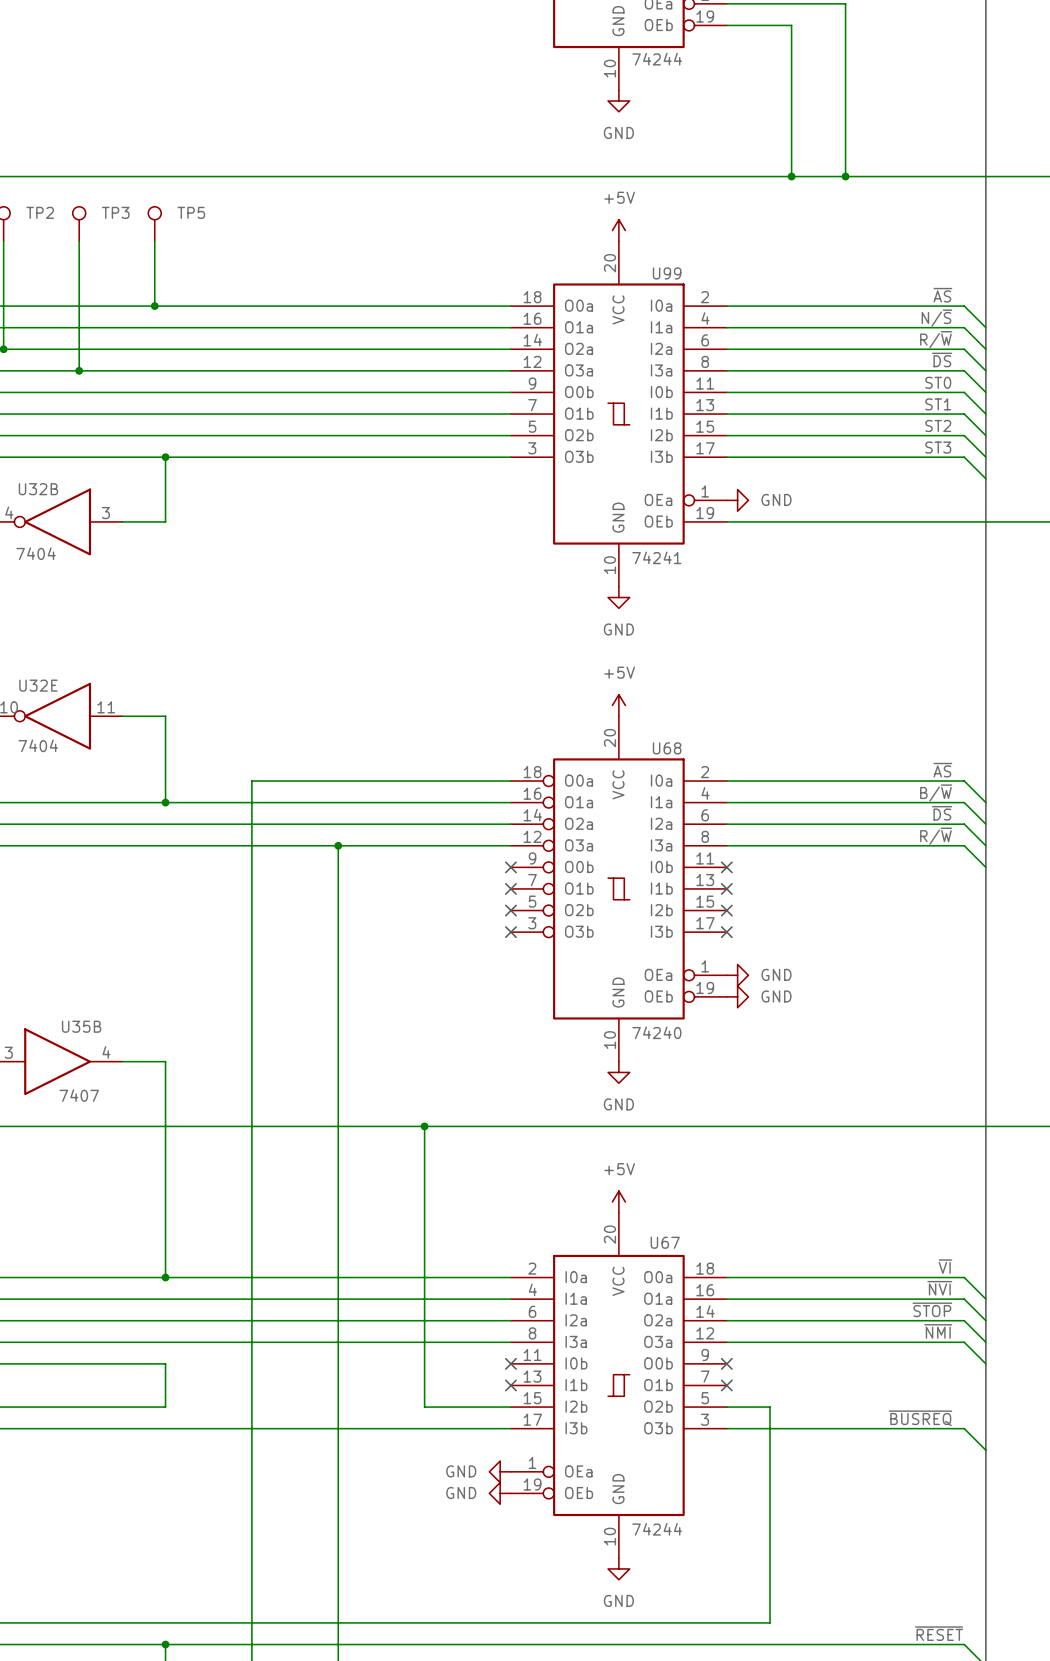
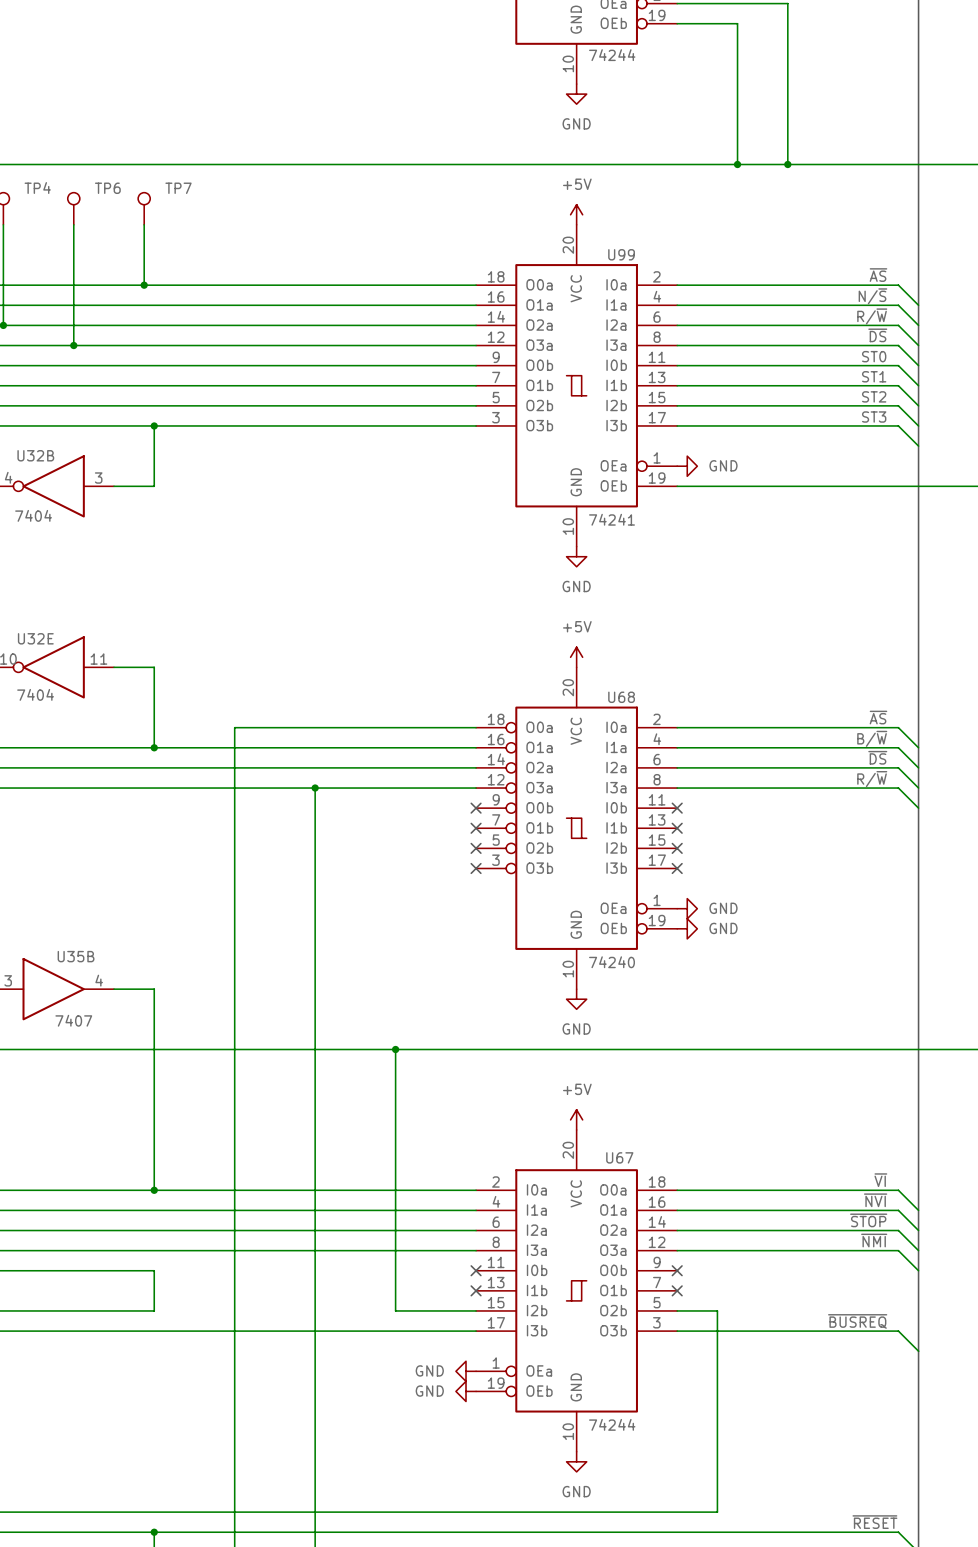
TP2 name: TP2 (40, 212) -> TP4 (37, 188)
TP3 name: TP3 (115, 212) -> TP6 (107, 188)
TP5 name: TP5 (191, 212) -> TP7 (178, 188)

